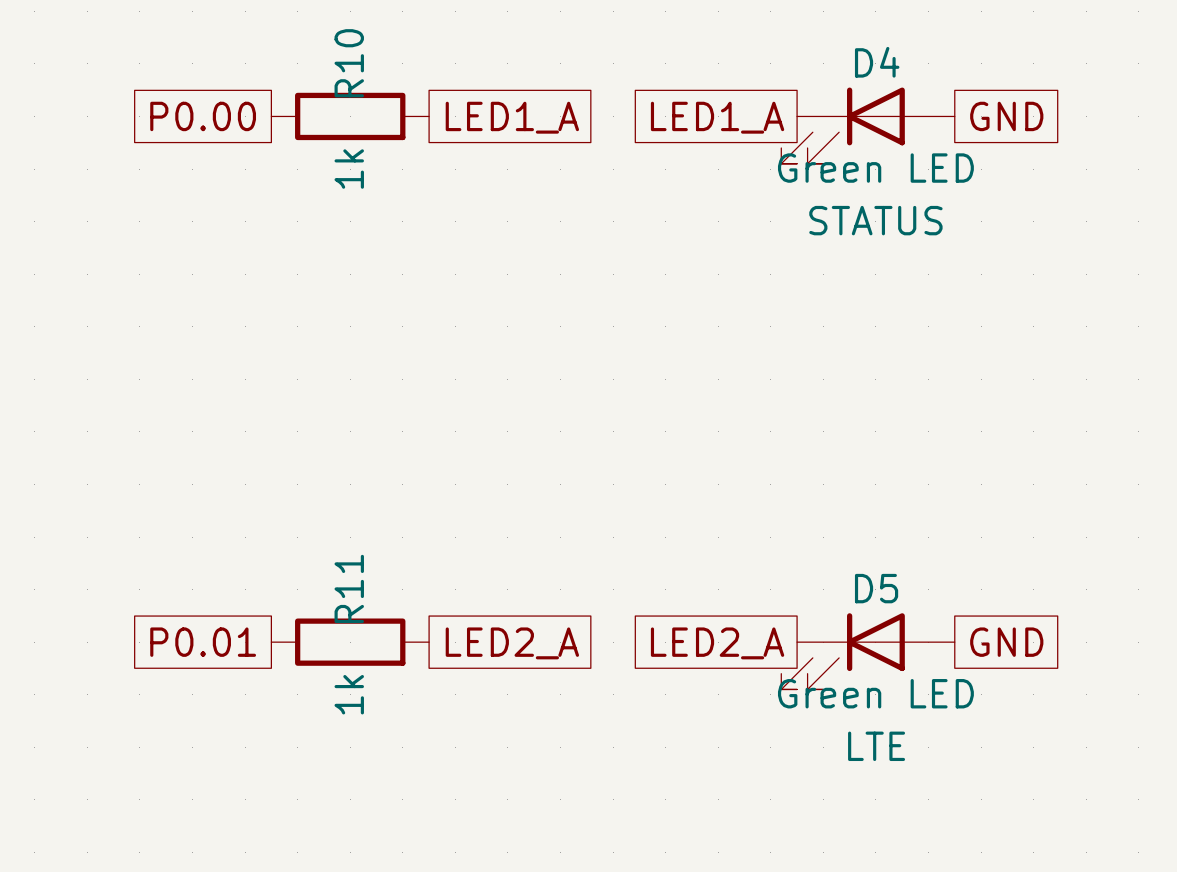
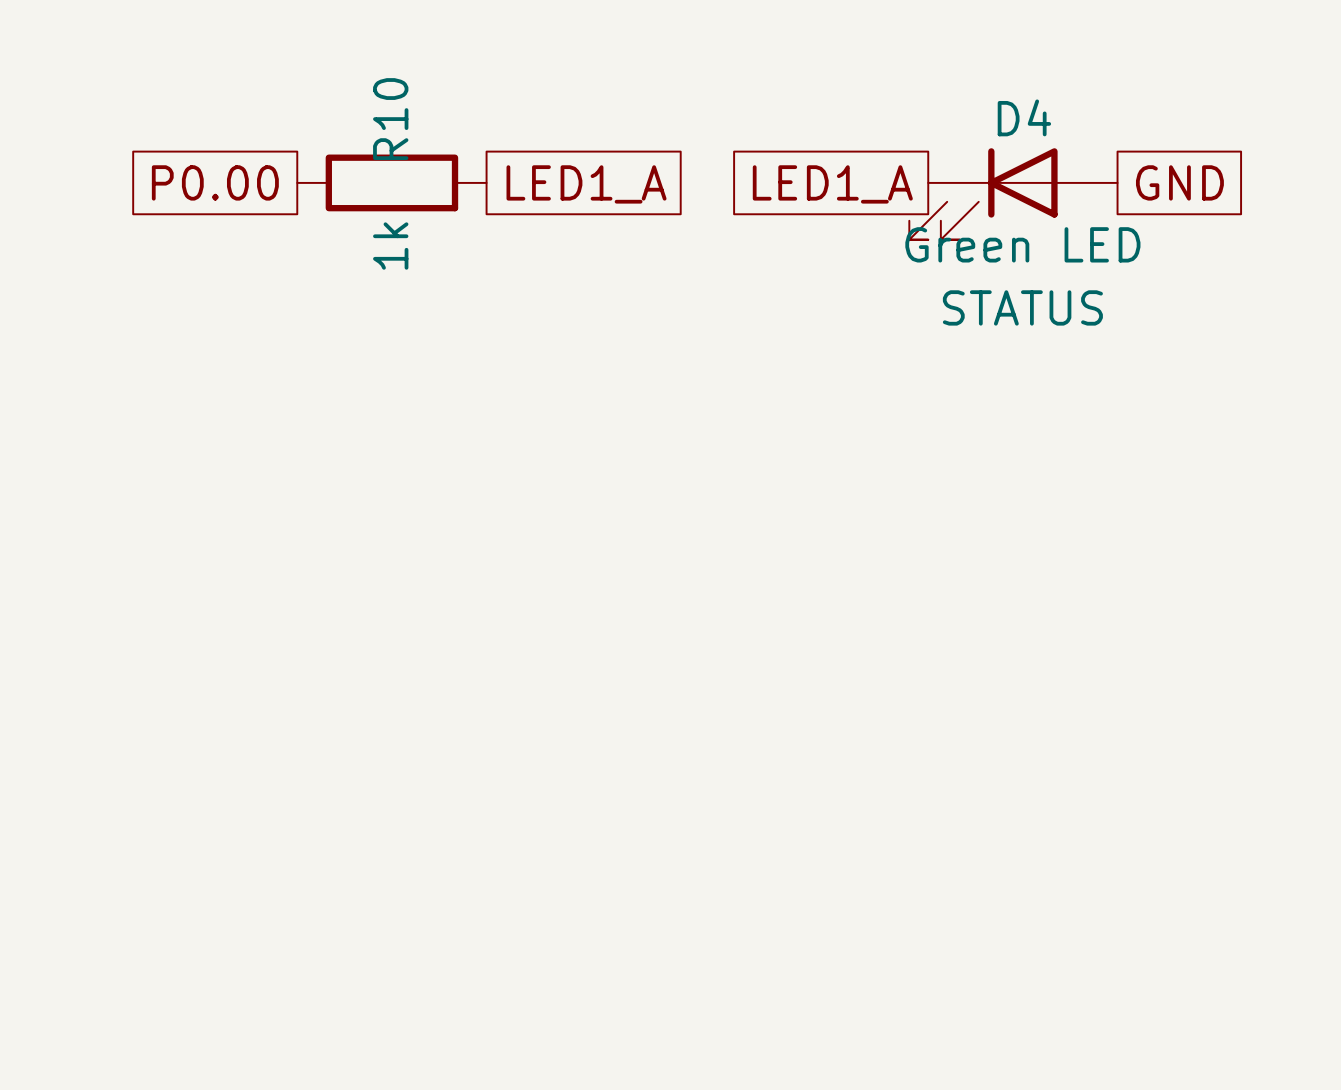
global label: P0.01 (203, 642) -> none
R11: 1k (350, 642) -> none
global label: GND (1006, 642) -> none
global label: LED2_A (512, 643) -> none
global label: LED2_A (717, 643) -> none
D5: Green LED (868, 651) -> none

